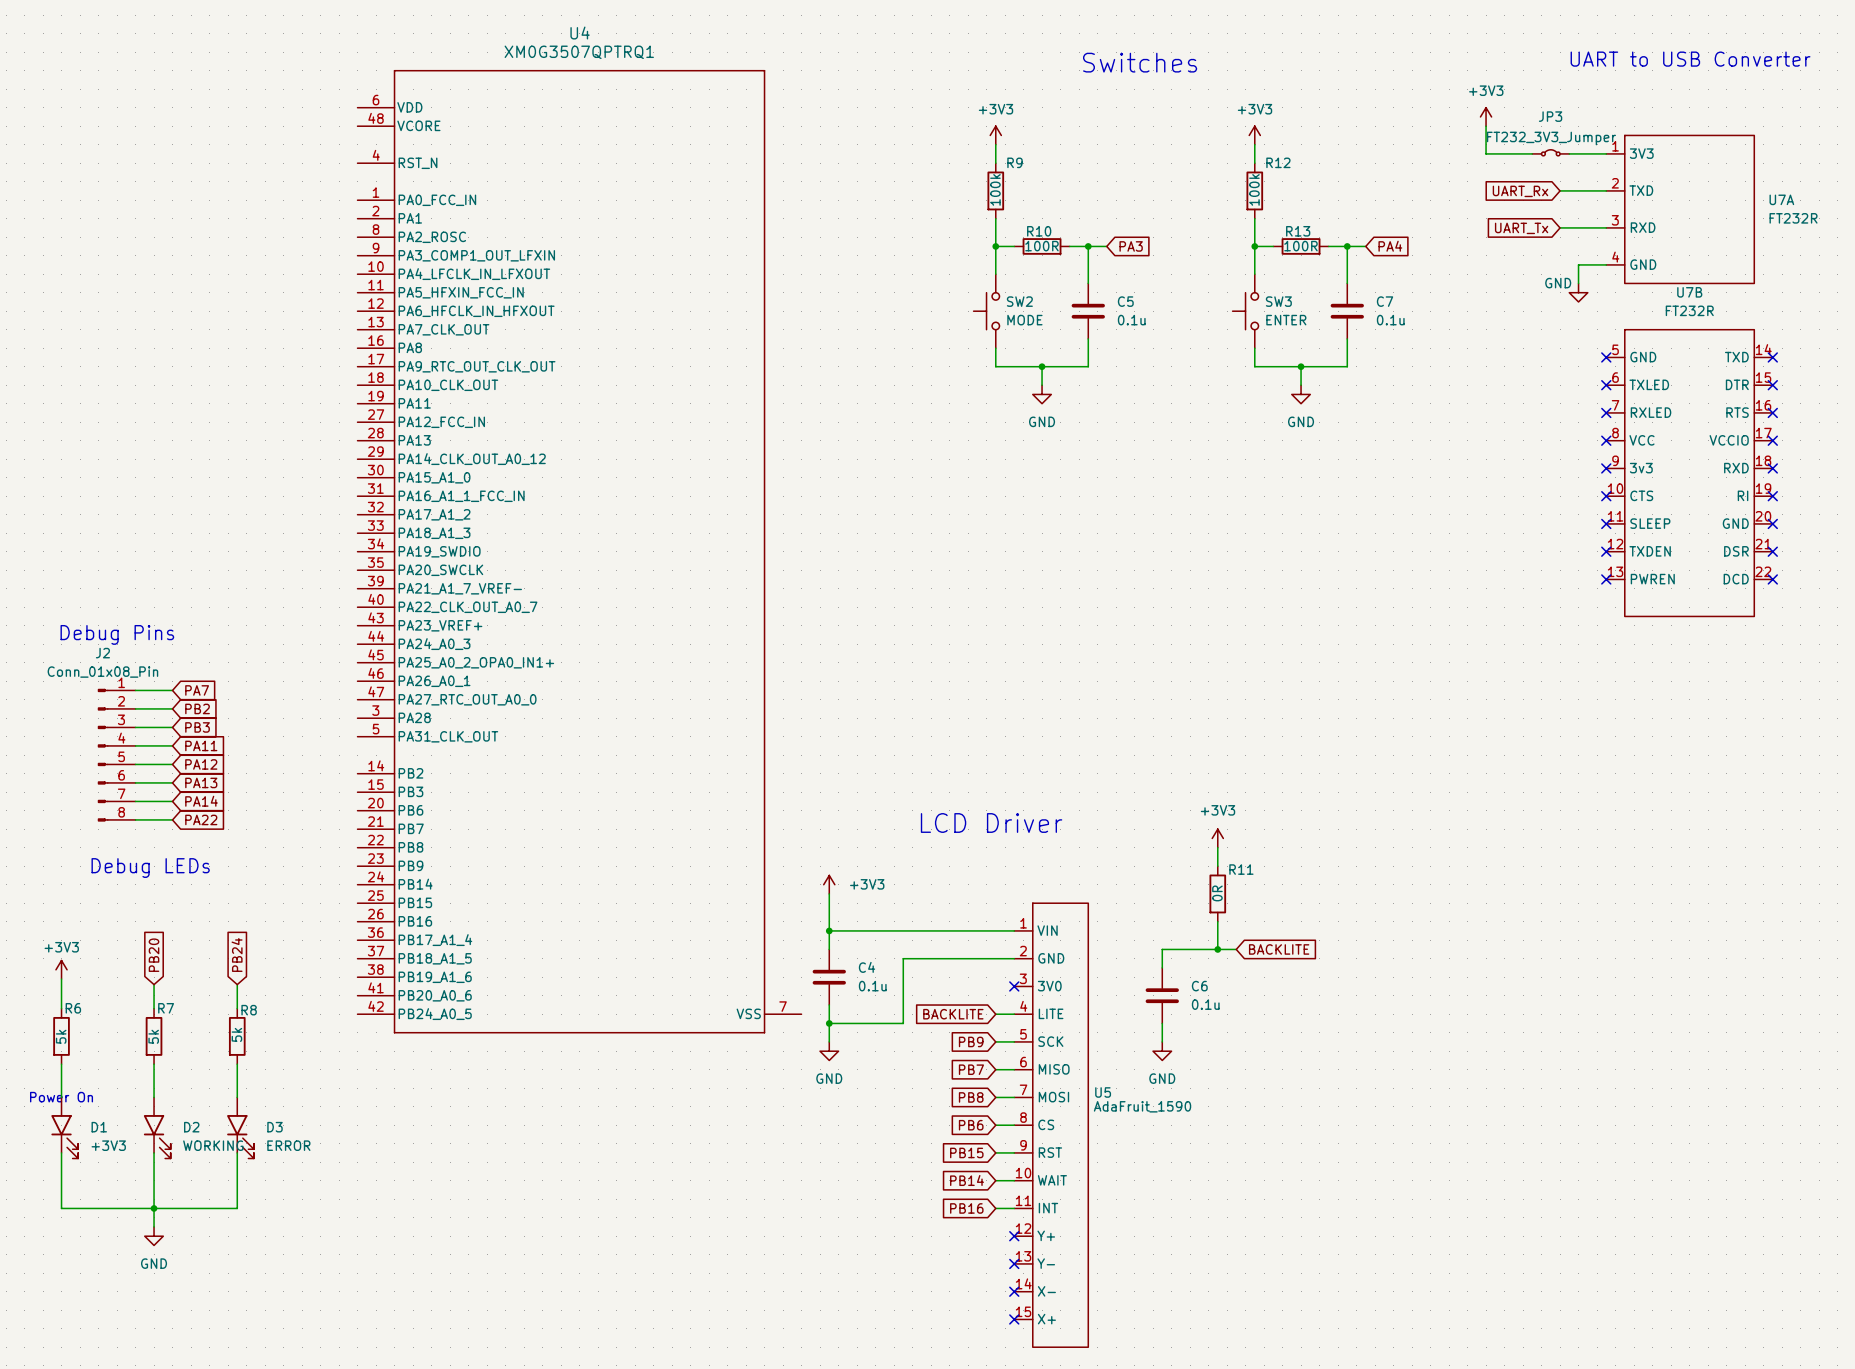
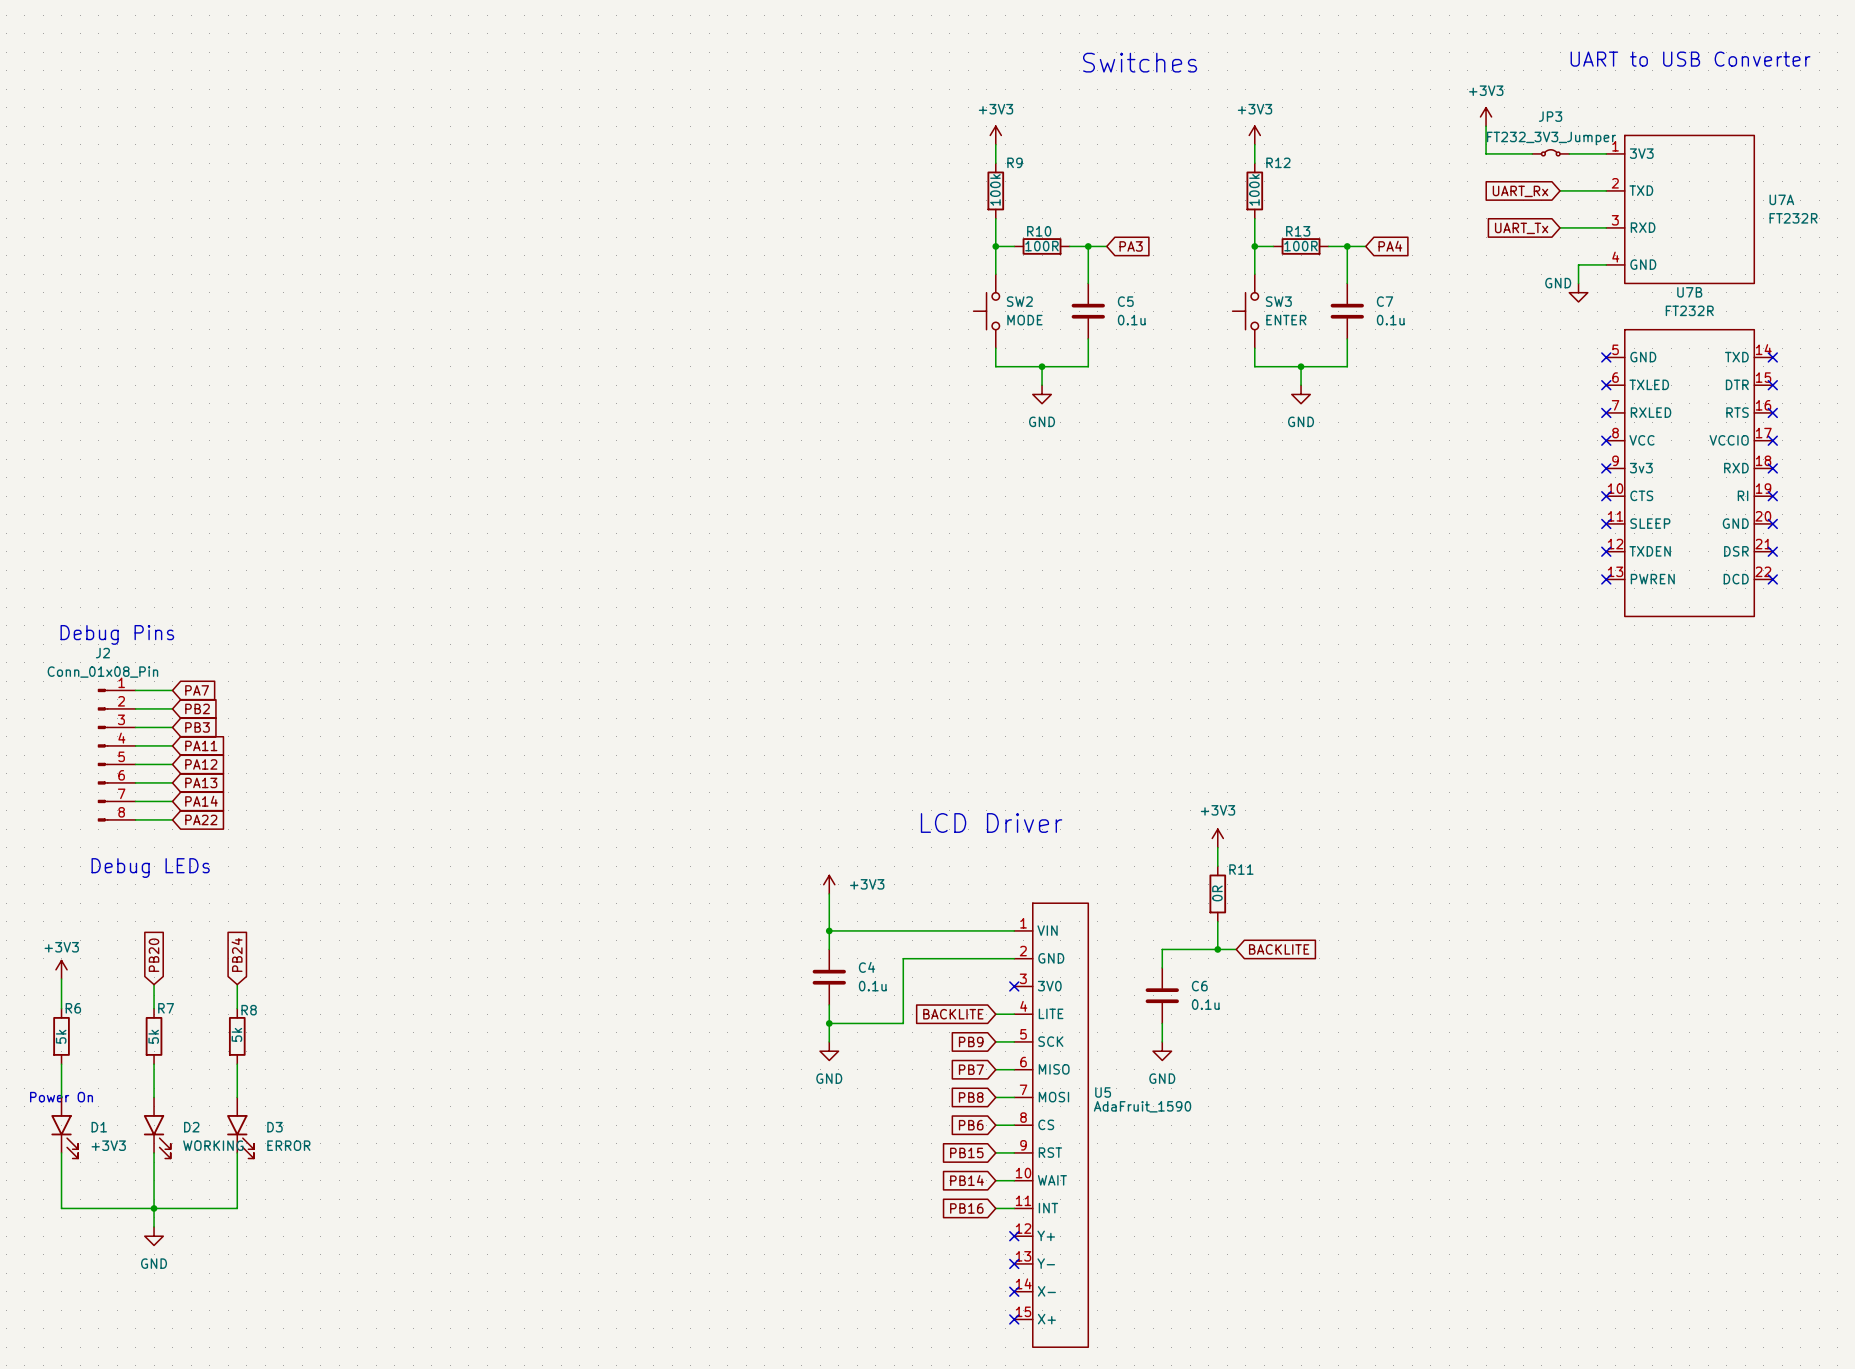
U4: XM0G3507QPTRQ1 (579, 551) -> none

